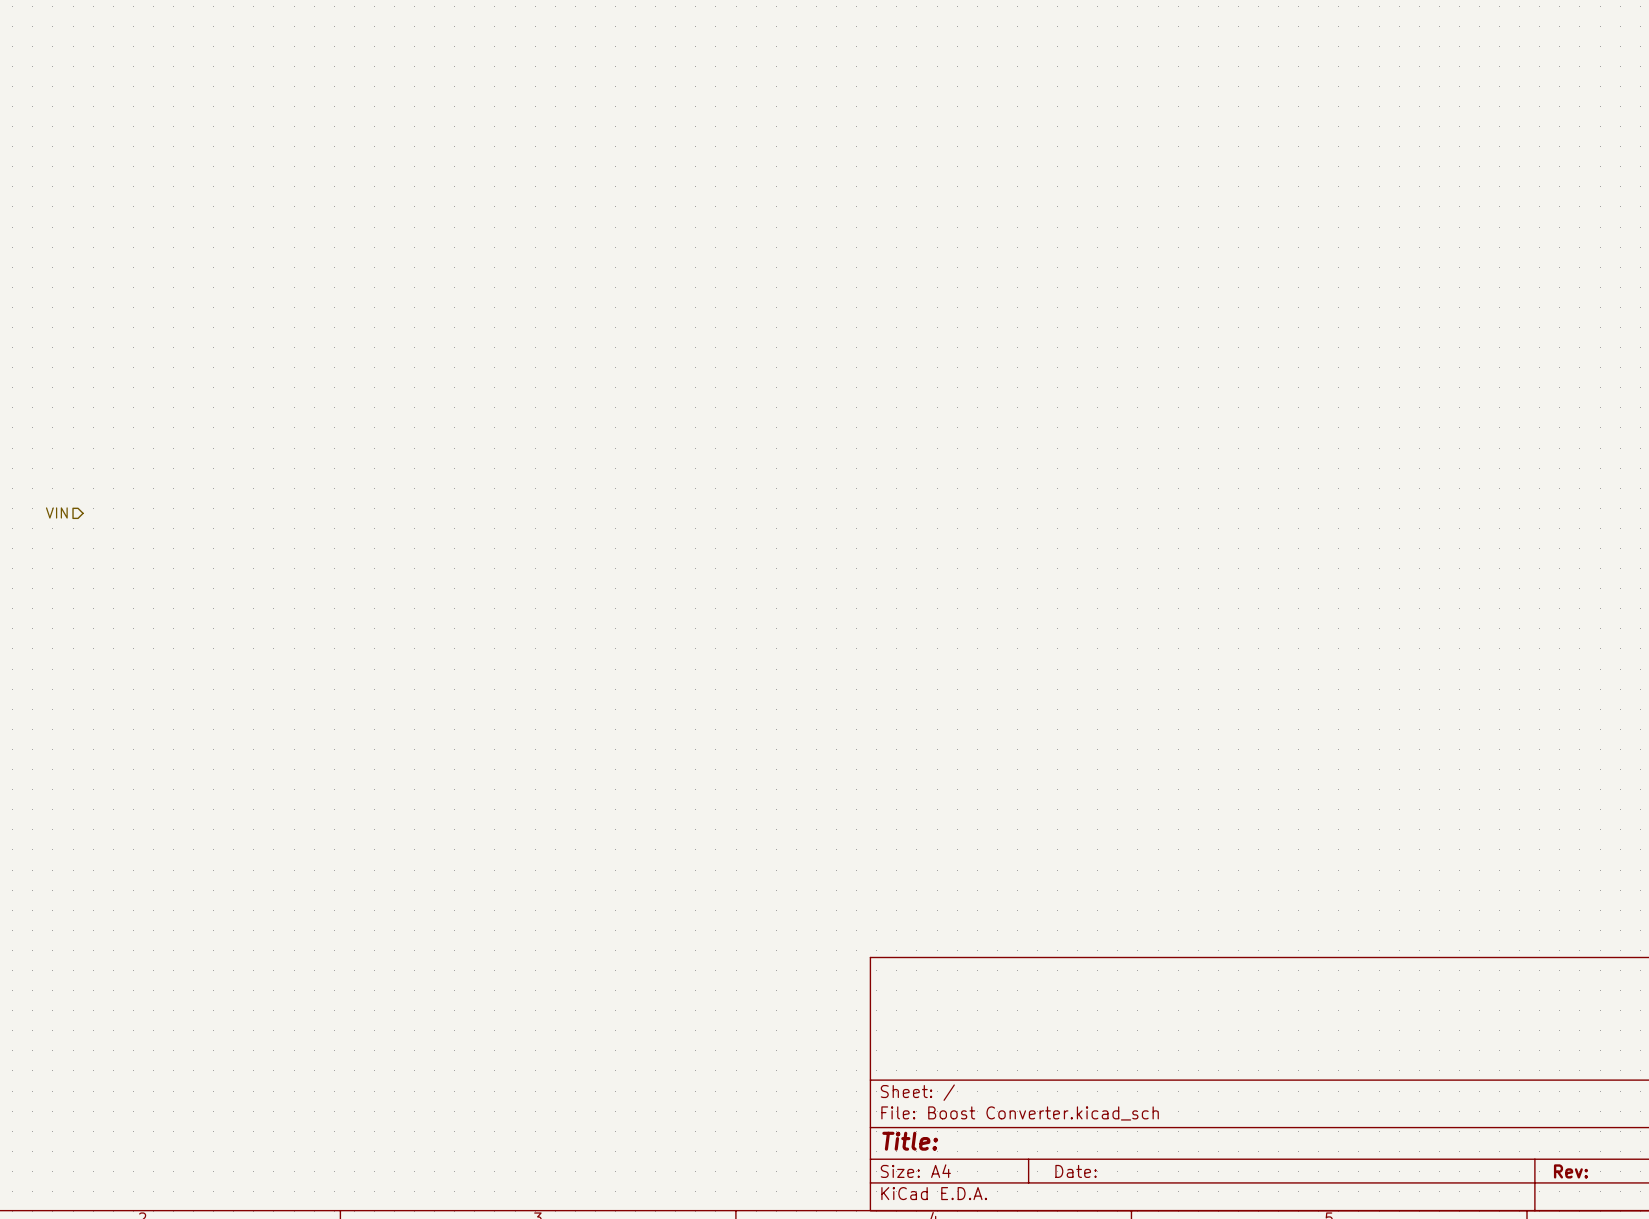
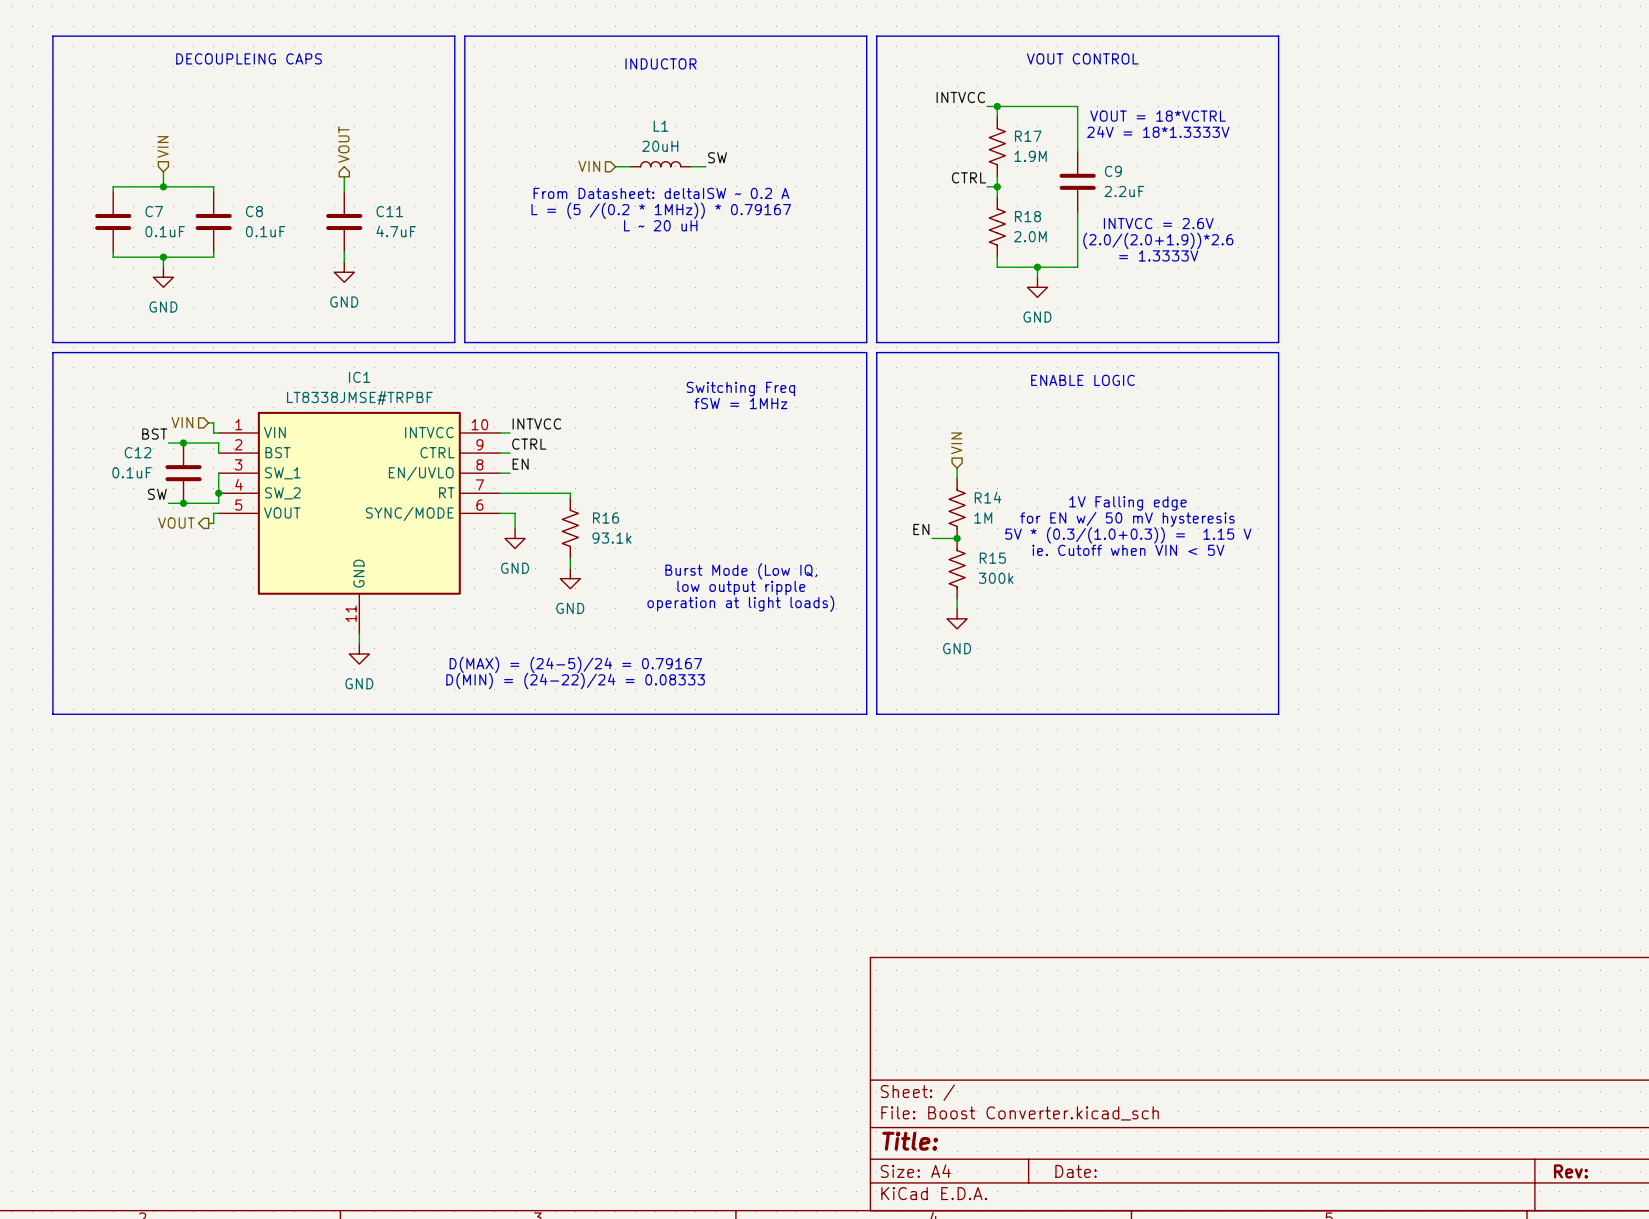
line: none -> (52, 36) (52, 342) (454, 342) (454, 36) (52, 36)
line: none -> (464, 36) (866, 36) (866, 342) (464, 342) (464, 36)
line: none -> (876, 36) (1278, 36) (1278, 342) (876, 342) (876, 36)
text: none -> DECOUPLEING CAPS (249, 58)
text: none -> VOUT CONTROL (1082, 58)
text: none -> INDUCTOR (660, 63)
label: none -> INTVCC (960, 97)
wire: none -> (987, 106) (1077, 106) (1077, 151)
wire: none -> (997, 106) (997, 116)
junction: none -> (997, 106)
text: none -> VOUT = 18*VCTRL (1158, 116)
text: none -> 24V = 18*1.3333V (1158, 132)
hierarchical label: none -> VOUT (343, 144)
hierarchical label: none -> VIN (163, 146)
R17: none -> 1.9M (997, 146)
label: none -> SW (717, 157)
L1: none -> 20uH (660, 164)
hierarchical label: none -> VIN (589, 166)
wire: none -> (615, 166) (630, 166)
wire: none -> (690, 166) (705, 166)
wire: none -> (163, 171) (163, 186)
wire: none -> (344, 176) (344, 191)
wire: none -> (997, 176) (997, 196)
label: none -> CTRL (968, 177)
C9: none -> 2.2uF (1077, 181)
junction: none -> (163, 186)
wire: none -> (987, 186) (997, 186)
junction: none -> (997, 186)
wire: none -> (113, 191) (113, 186) (213, 186) (213, 191)
text: none -> From Datasheet: deltaISW ~ 0.2 A (661, 193)
text: none -> L = (5 /(0.2 * 1MHz)) * 0.79167 (661, 210)
wire: none -> (1077, 211) (1077, 267) (997, 267) (997, 257)
C7: none -> 0.1uF (113, 222)
C8: none -> 0.1uF (213, 222)
C11: none -> 4.7uF (344, 222)
text: none -> INTVCC = 2.6V (1158, 223)
text: none -> L ~ 20 uH (660, 225)
R18: none -> 2.0M (997, 227)
text: none -> (2.0/(2.0+1.9))*2.6 (1158, 240)
wire: none -> (113, 252) (113, 257) (213, 257) (213, 252)
wire: none -> (344, 252) (344, 262)
text: none -> = 1.3333V (1158, 255)
wire: none -> (163, 257) (163, 267)
junction: none -> (163, 257)
wire: none -> (1037, 267) (1037, 277)
junction: none -> (1037, 267)
power symbol: none -> GND (344, 272)
power symbol: none -> GND (163, 277)
power symbol: none -> GND (1037, 287)
line: none -> (52, 352) (866, 352) (866, 714) (52, 714) (52, 352)
line: none -> (876, 352) (1278, 352) (1278, 714) (876, 714) (876, 352)
text: none -> ENABLE LOGIC (1082, 380)
text: none -> Switching Freq (740, 389)
text: none -> fSW = 1MHz (740, 403)
wire: none -> (208, 422) (213, 422) (213, 432) (218, 432)
label: none -> INTVCC (536, 424)
wire: none -> (499, 432) (510, 432)
label: none -> BST (154, 434)
wire: none -> (168, 443) (218, 443) (218, 453)
junction: none -> (183, 443)
hierarchical label: none -> VIN (956, 443)
label: none -> CTRL (529, 444)
wire: none -> (499, 453) (510, 453)
label: none -> EN (520, 464)
wire: none -> (957, 468) (957, 478)
C12: none -> 0.1uF (183, 473)
wire: none -> (218, 473) (218, 503) (168, 503)
wire: none -> (499, 473) (510, 473)
junction: none -> (218, 493)
wire: none -> (499, 493) (570, 493) (570, 498)
label: none -> SW (157, 494)
junction: none -> (183, 503)
text: none -> 1V Falling edge (1127, 503)
R14: none -> 1M (957, 508)
hierarchical label position: VIN (56, 512) -> VIN (182, 422)
wire: none -> (218, 513) (213, 513) (213, 523) (208, 523)
wire: none -> (499, 513) (515, 513) (515, 528)
text: none -> for EN w/ 50 mV hysteresis (1127, 519)
IC1: none -> LT8338JMSE#TRPBF (359, 522)
hierarchical label: none -> VOUT (176, 523)
R16: none -> 93.1k (570, 528)
label: none -> EN (921, 529)
text: none -> 5V * (0.3/(1.0+0.3)) = 1.15 V (1128, 535)
power symbol: none -> GND (515, 538)
wire: none -> (931, 538) (957, 538)
junction: none -> (957, 538)
text: none -> ie. Cutoff when VIN < 5V (1128, 550)
wire: none -> (570, 558) (570, 568)
R15: none -> 300k (957, 568)
text: none -> Burst Mode (Low IQ, (741, 571)
power symbol: none -> GND (570, 578)
text: none -> low output ripple (741, 588)
wire: none -> (957, 598) (957, 608)
text: none -> operation at light loads) (740, 603)
power symbol: none -> GND (957, 618)
wire: none -> (359, 633) (359, 643)
power symbol: none -> GND (359, 654)
text: none -> D(MAX) = (24-5)/24 = 0.79167 (575, 664)
text: none -> D(MIN) = (24-22)/24 = 0.08333 (575, 681)

